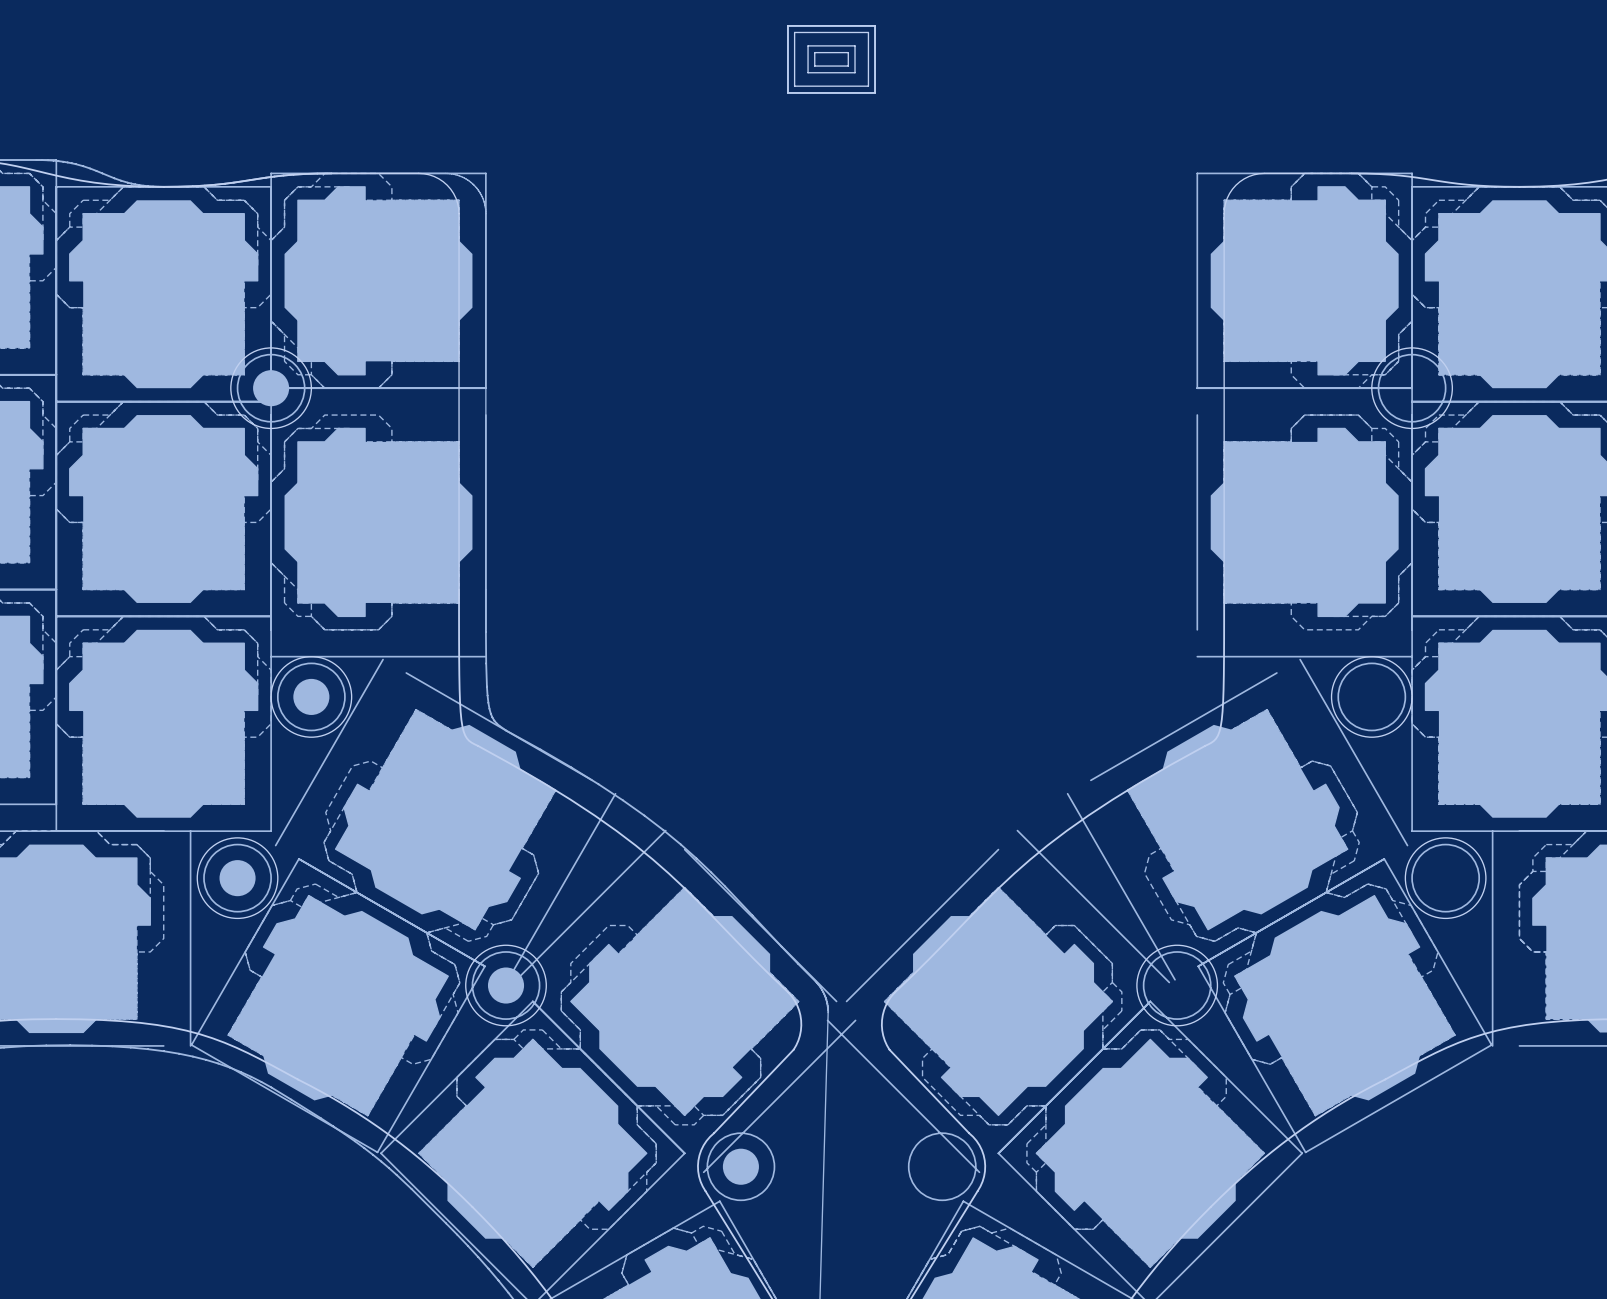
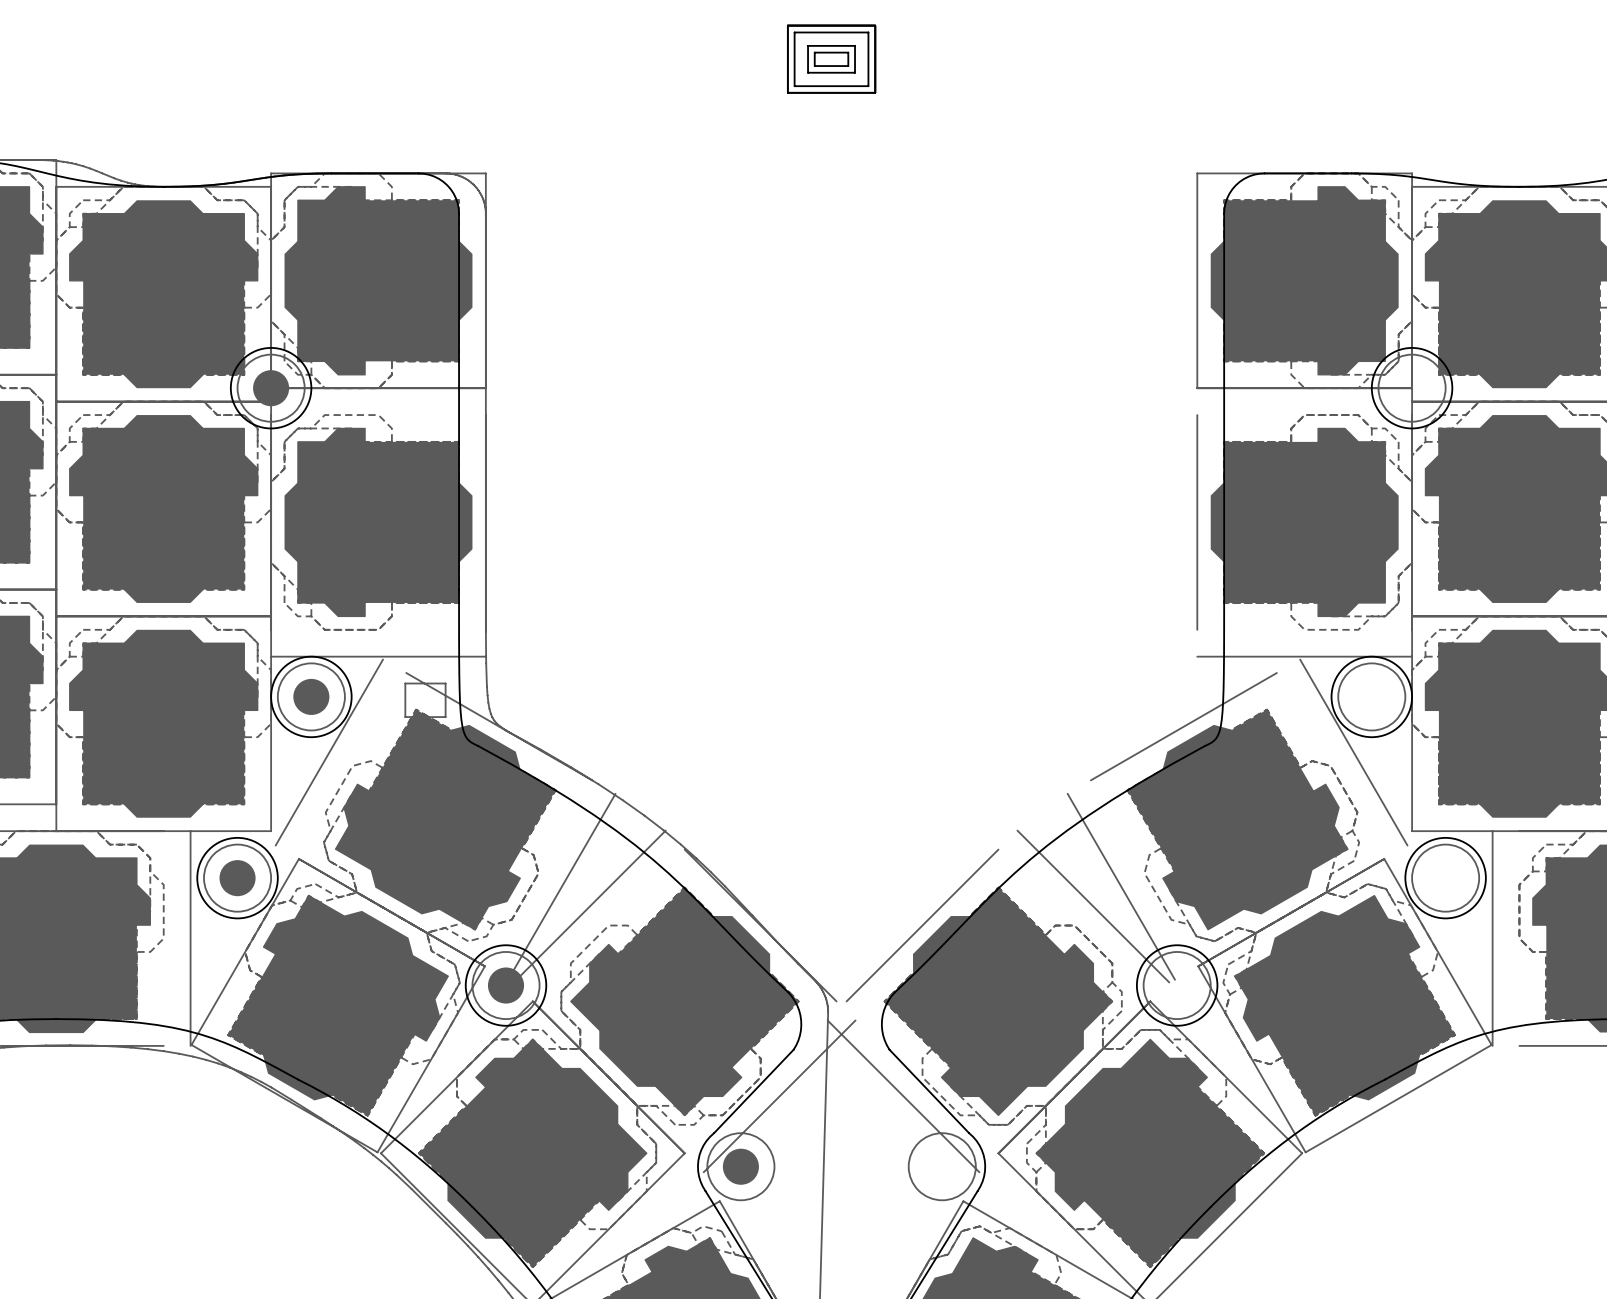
line: none -> (405, 683) (445, 683) (445, 717) (405, 717) (405, 683)

